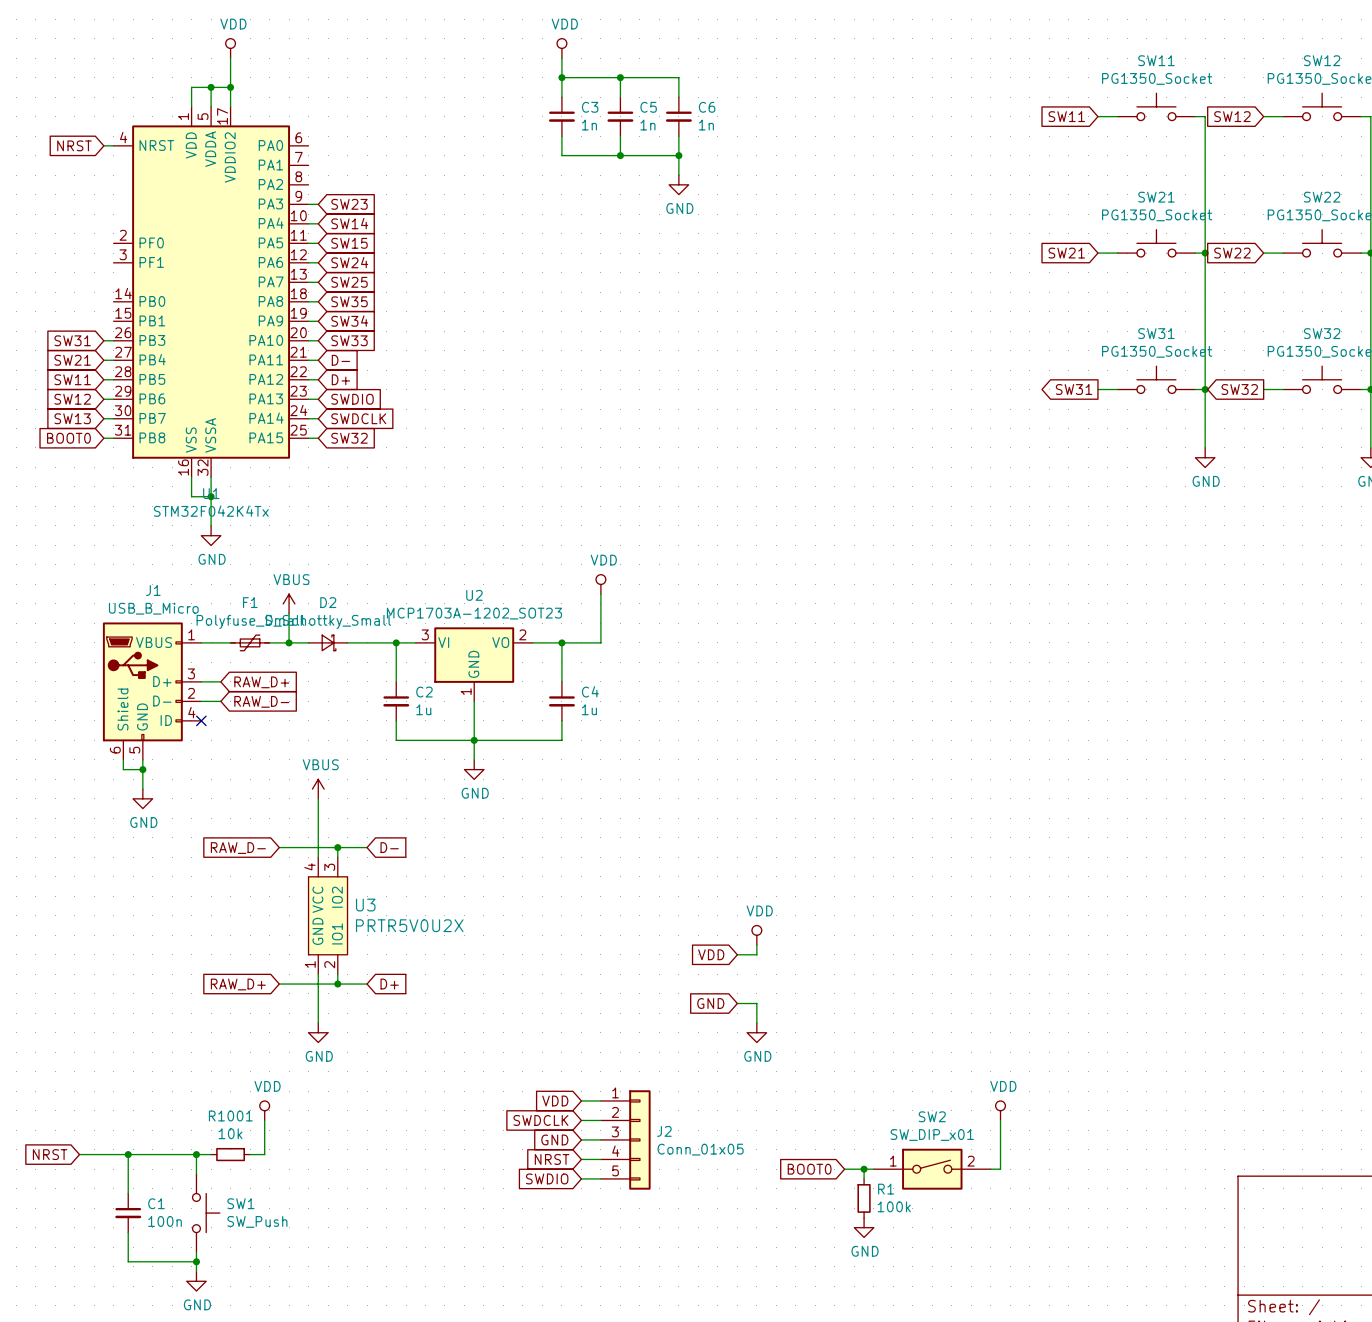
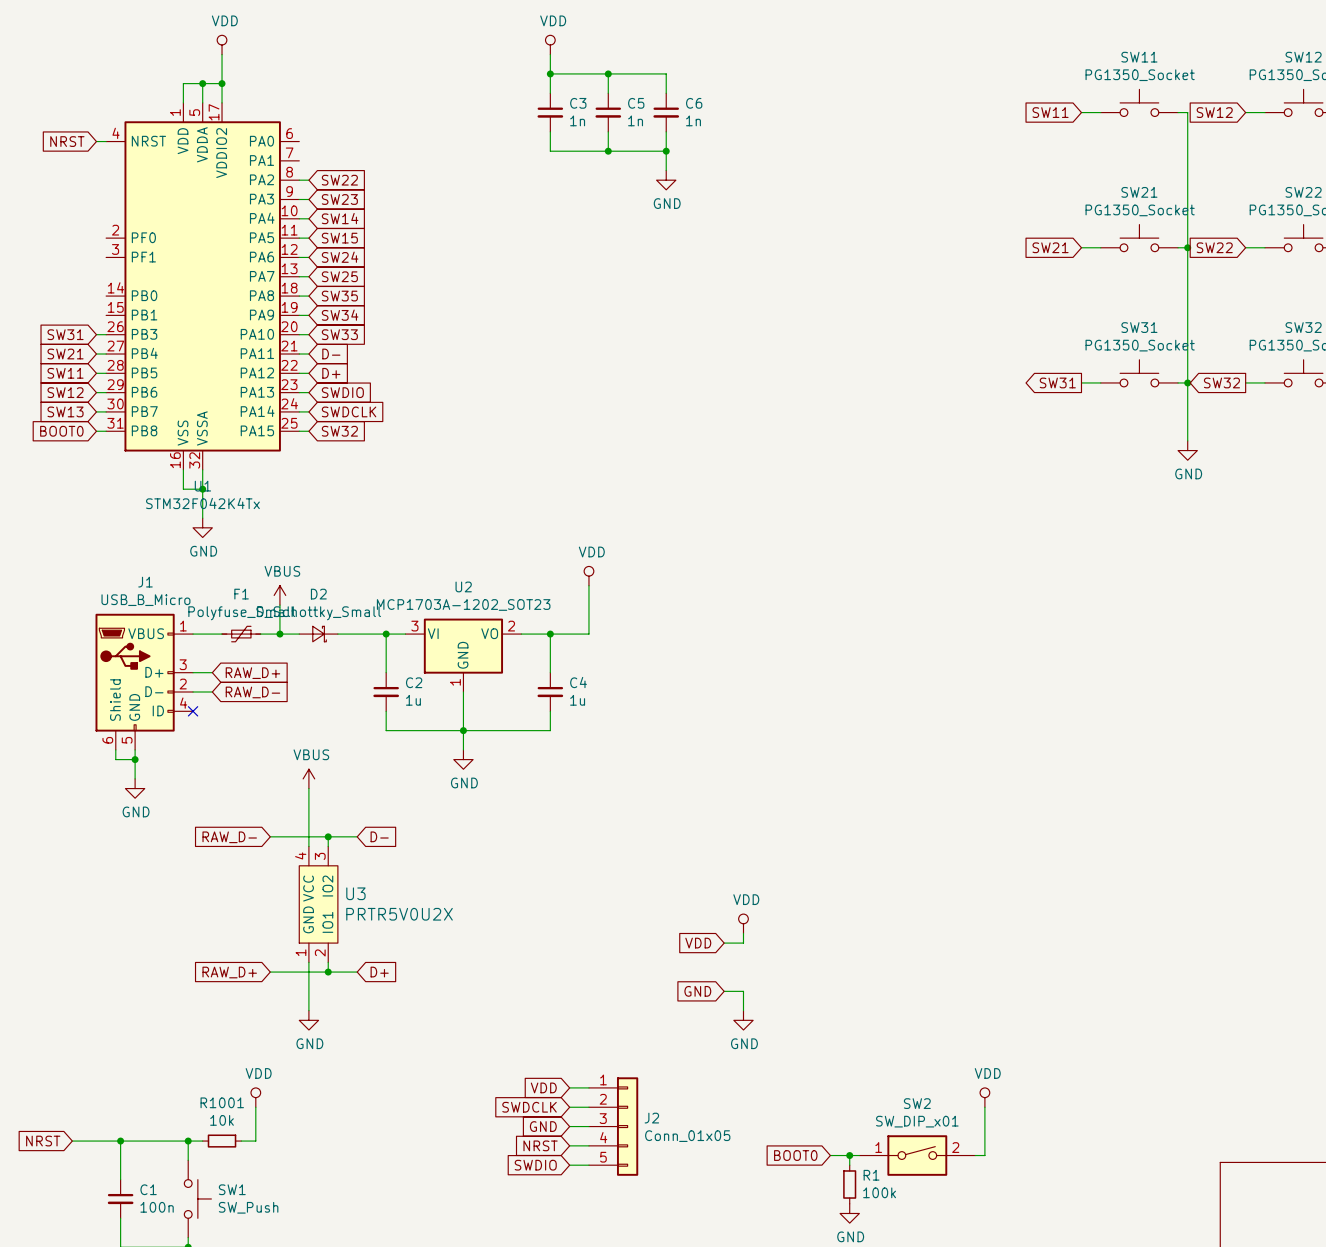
wire: none -> (299, 180) (308, 180)
global label: none -> SW22 (339, 180)

